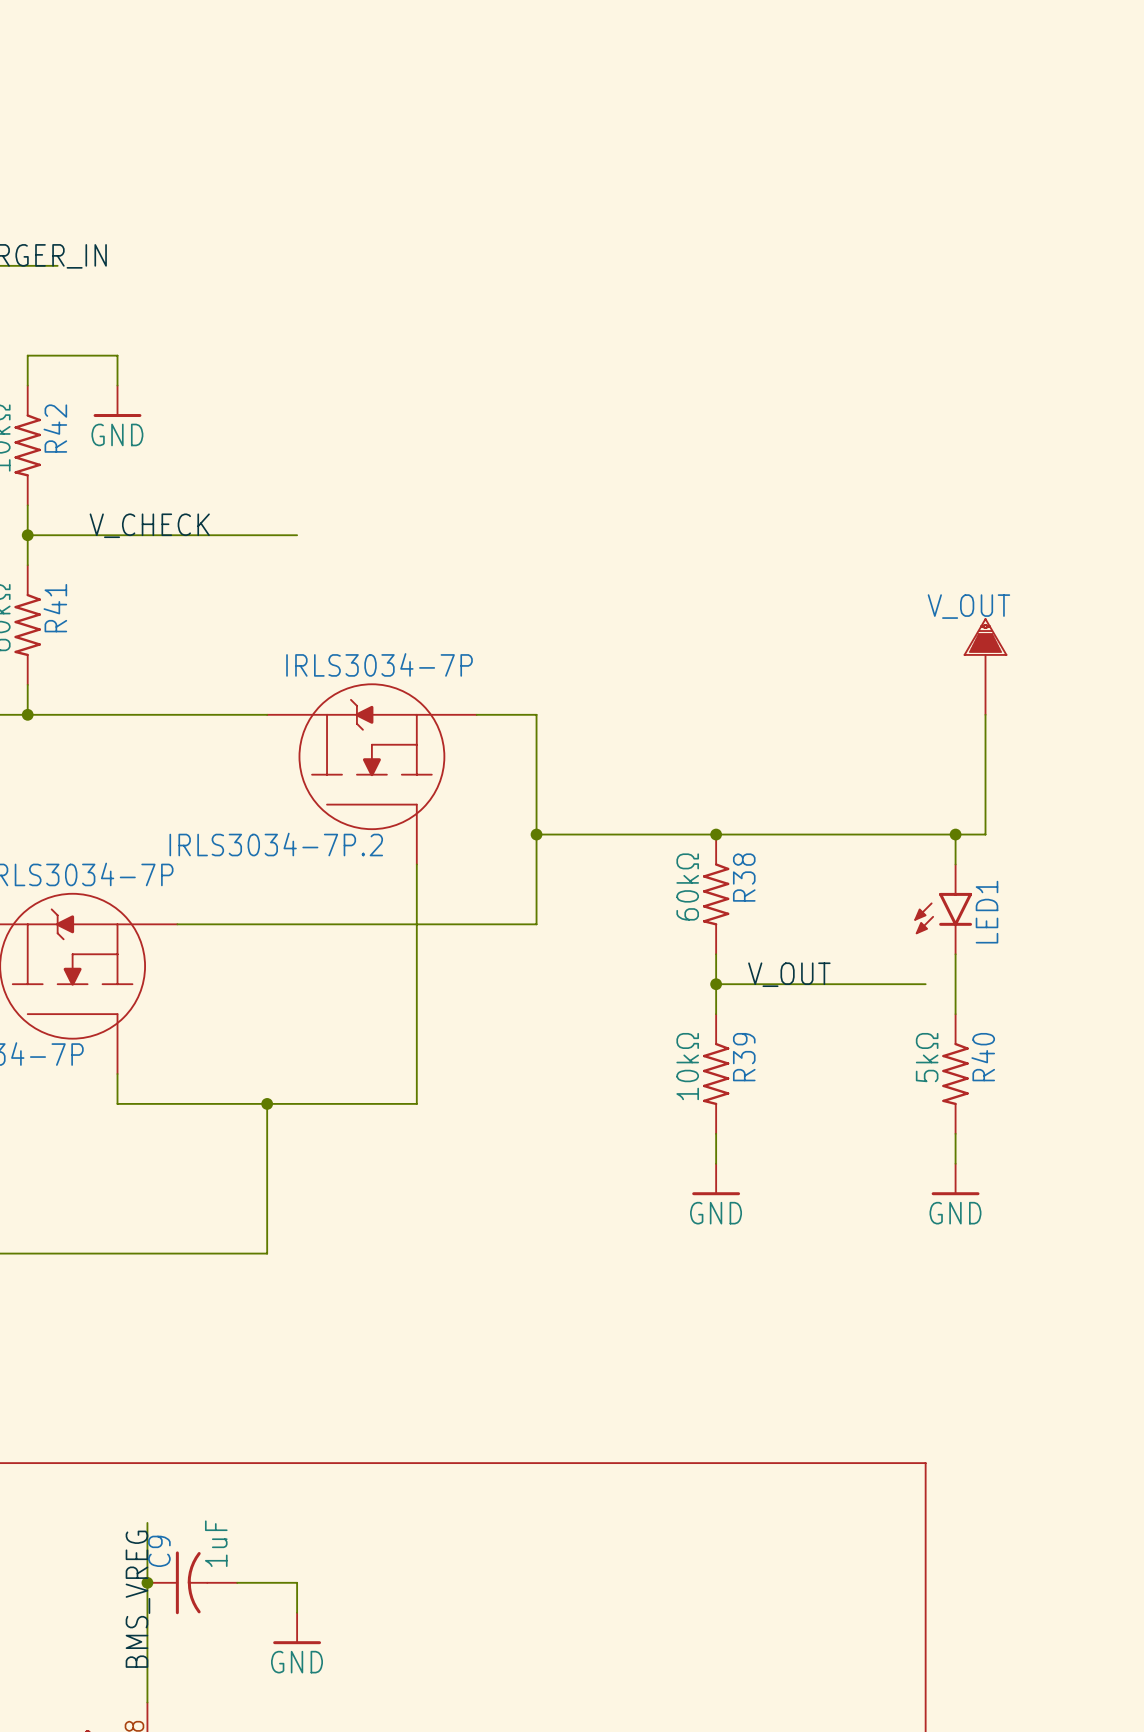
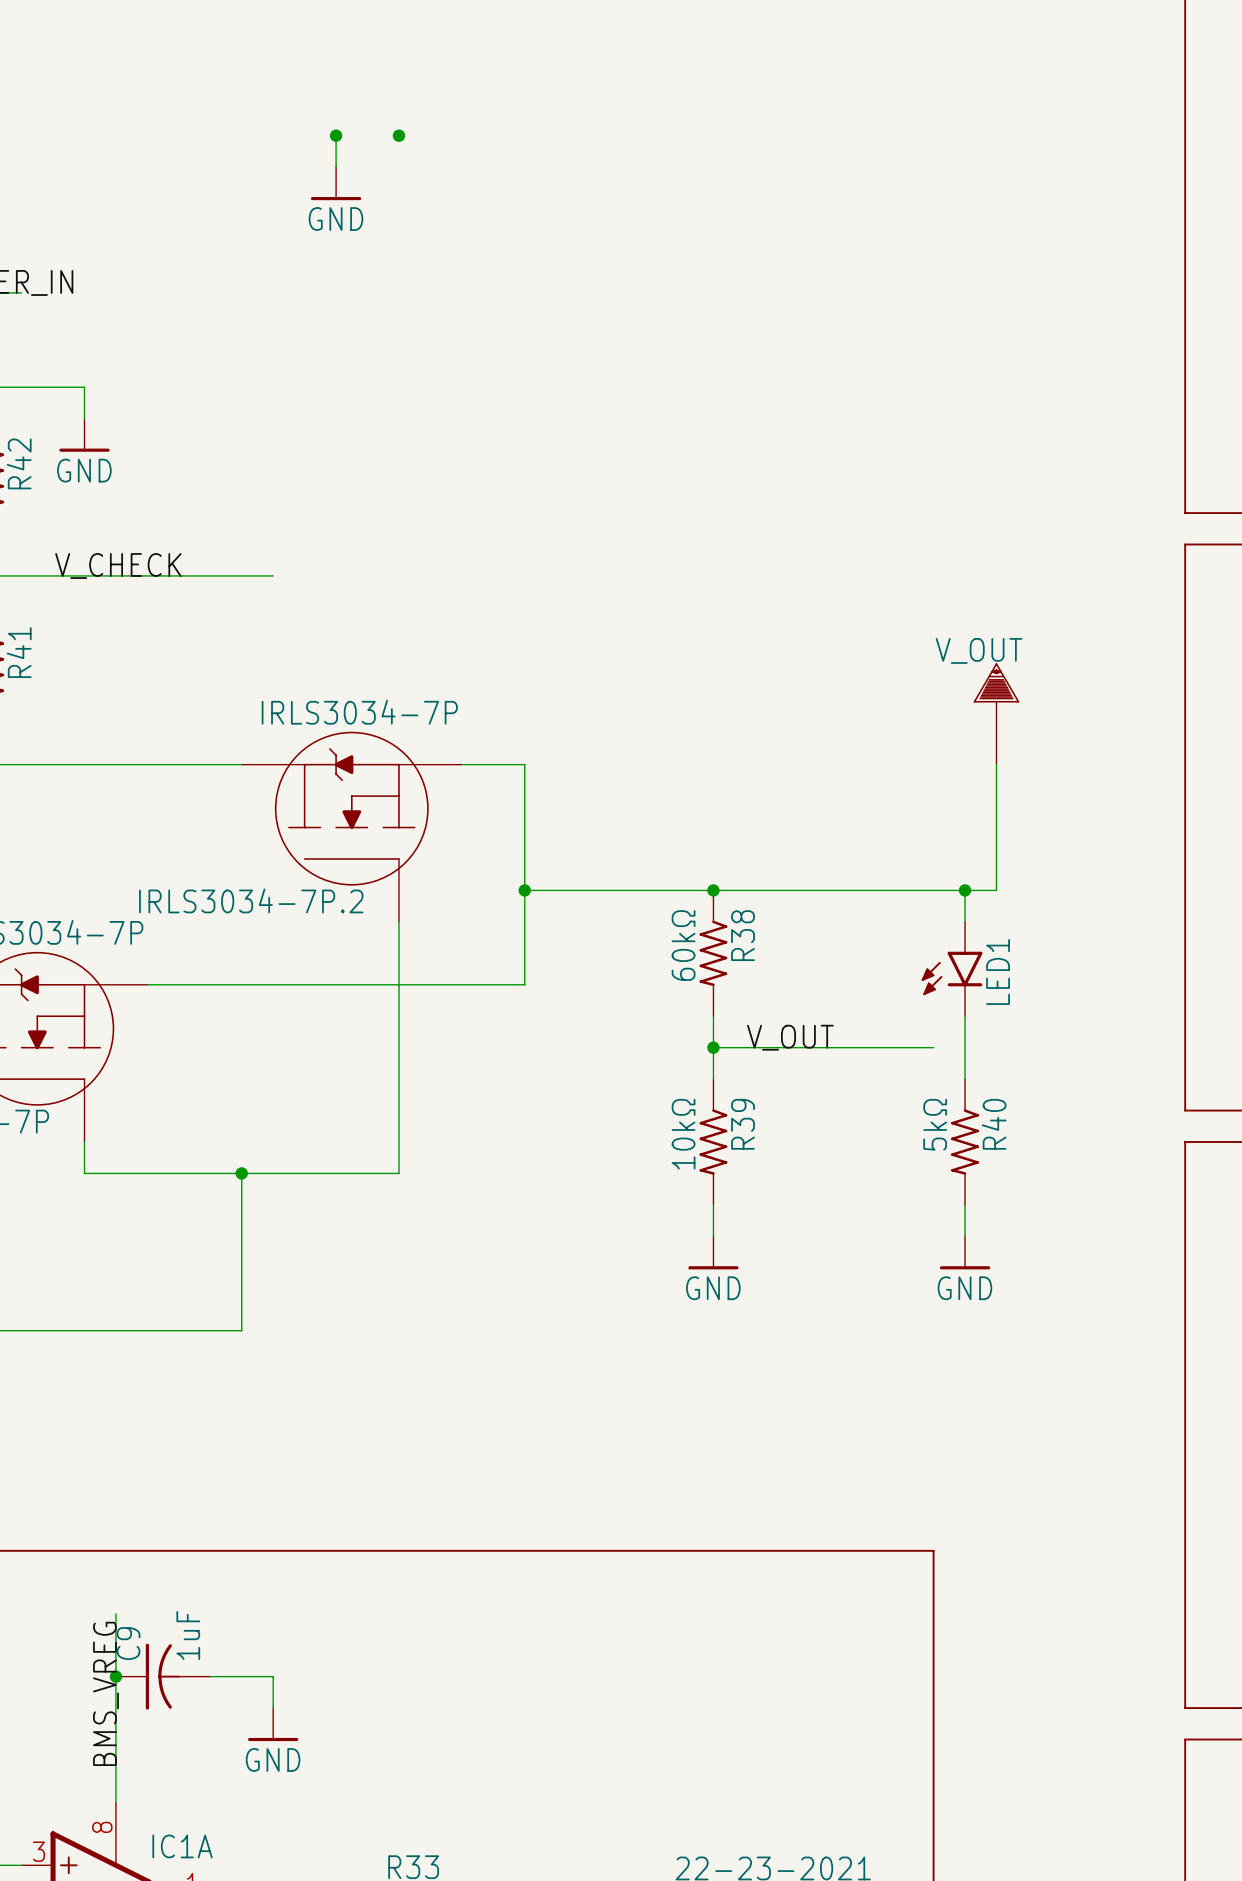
wire: none -> (336, 135) (336, 167)
junction: none -> (336, 135)
junction: none -> (398, 135)
power symbol: none -> GND (336, 183)

